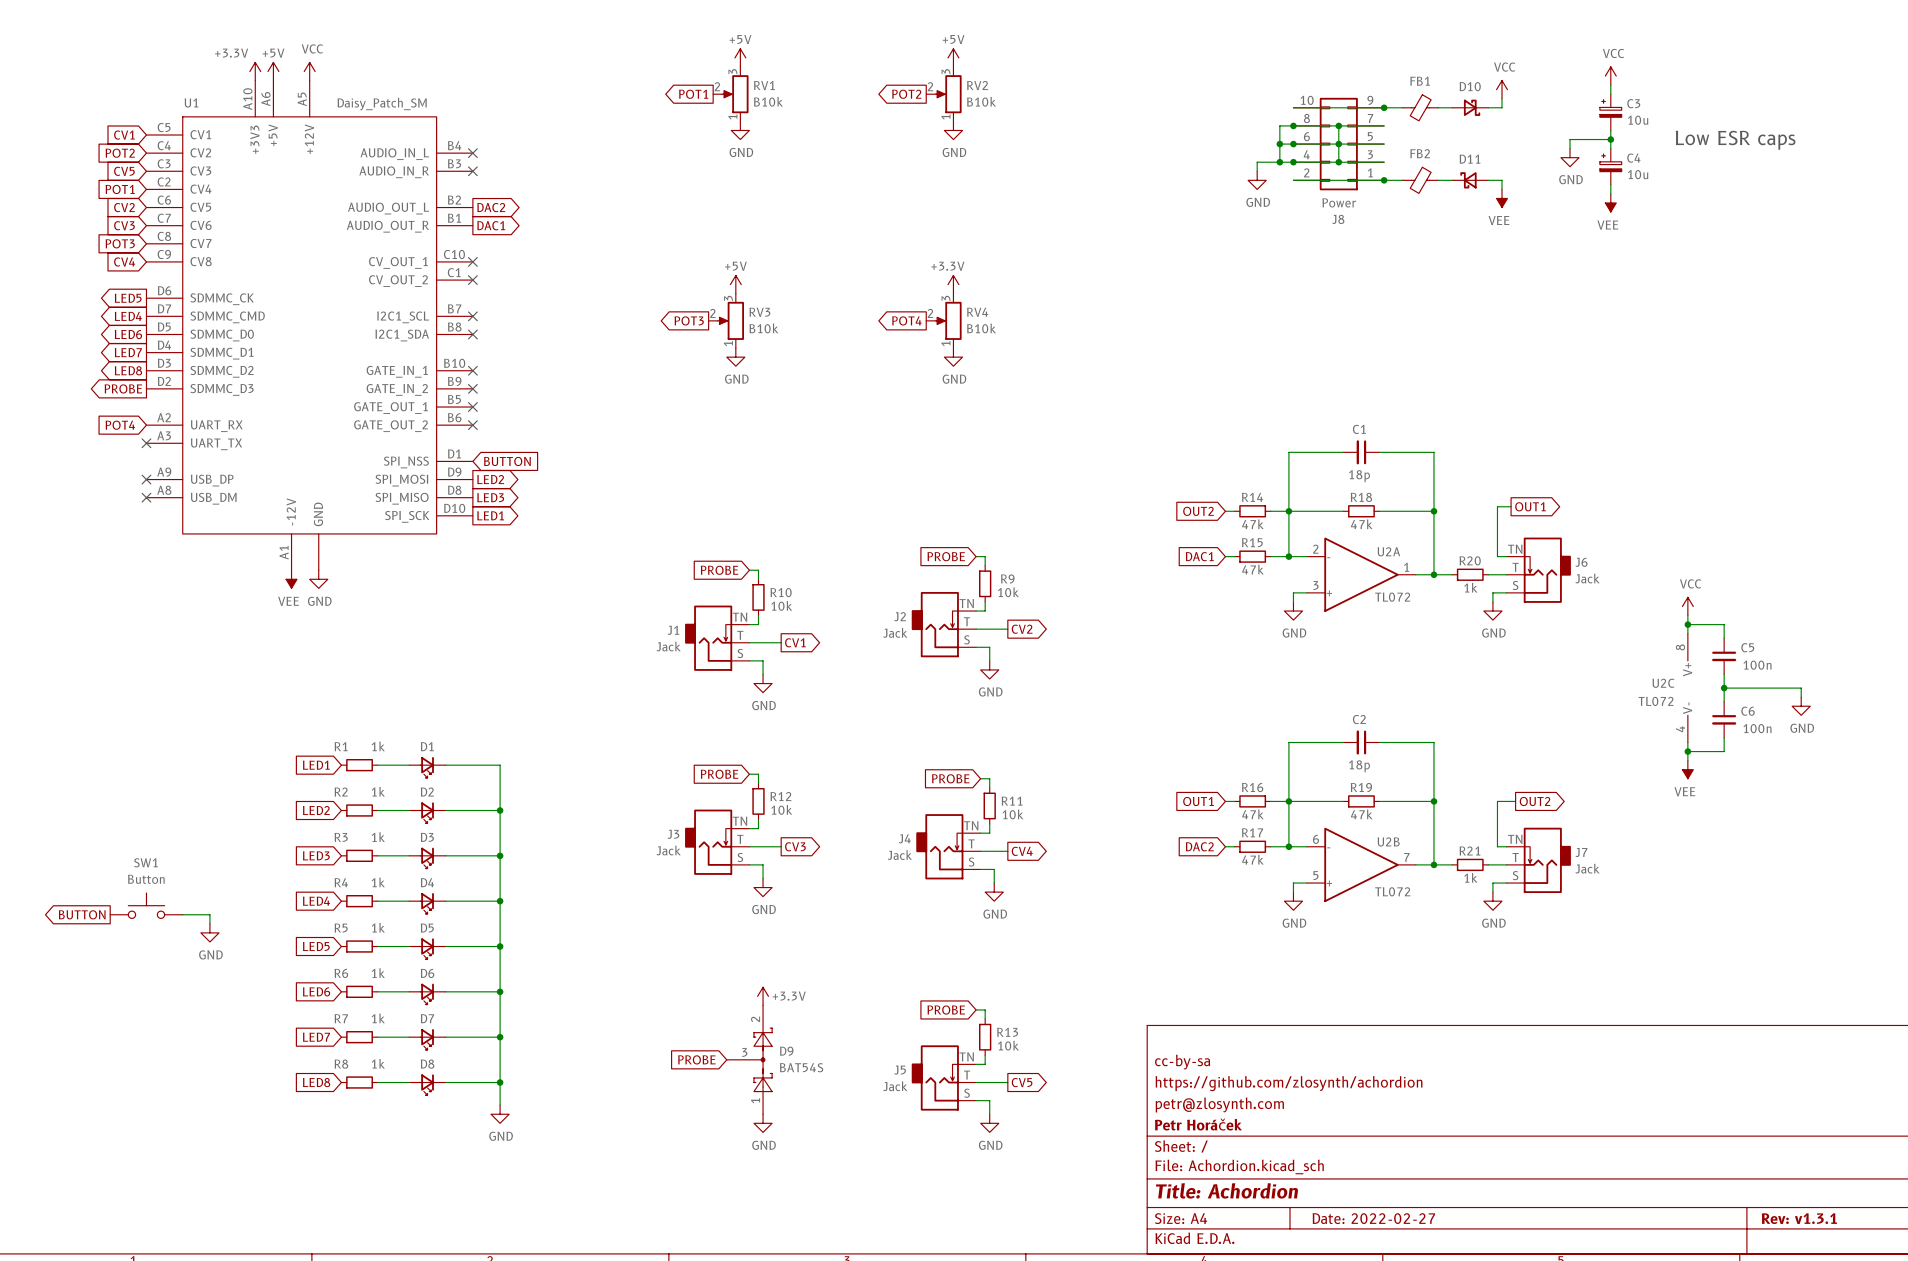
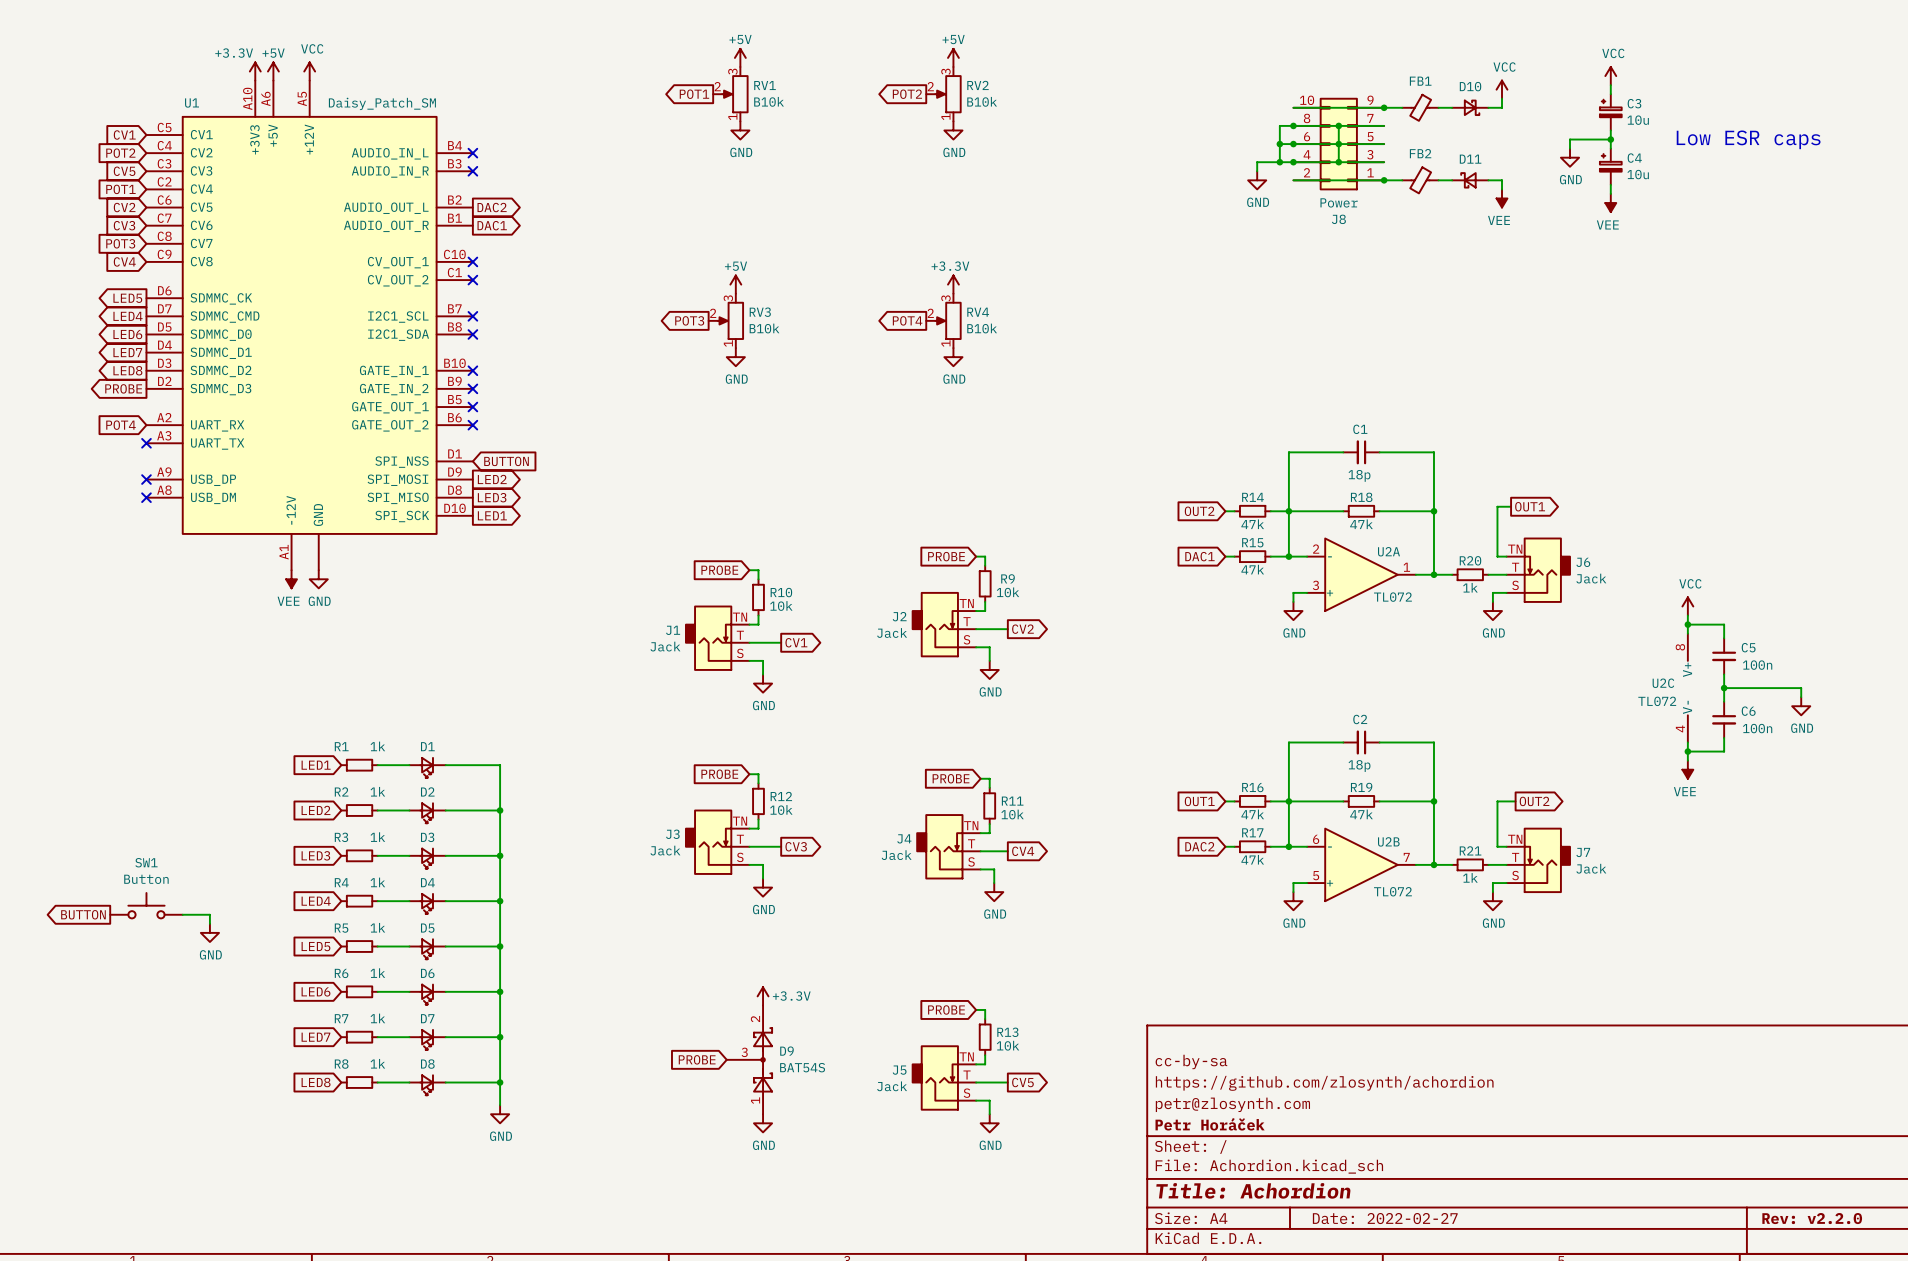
title block: Rev: v1.3.1 (1799, 1218) -> Rev: v2.2.0 (1812, 1218)

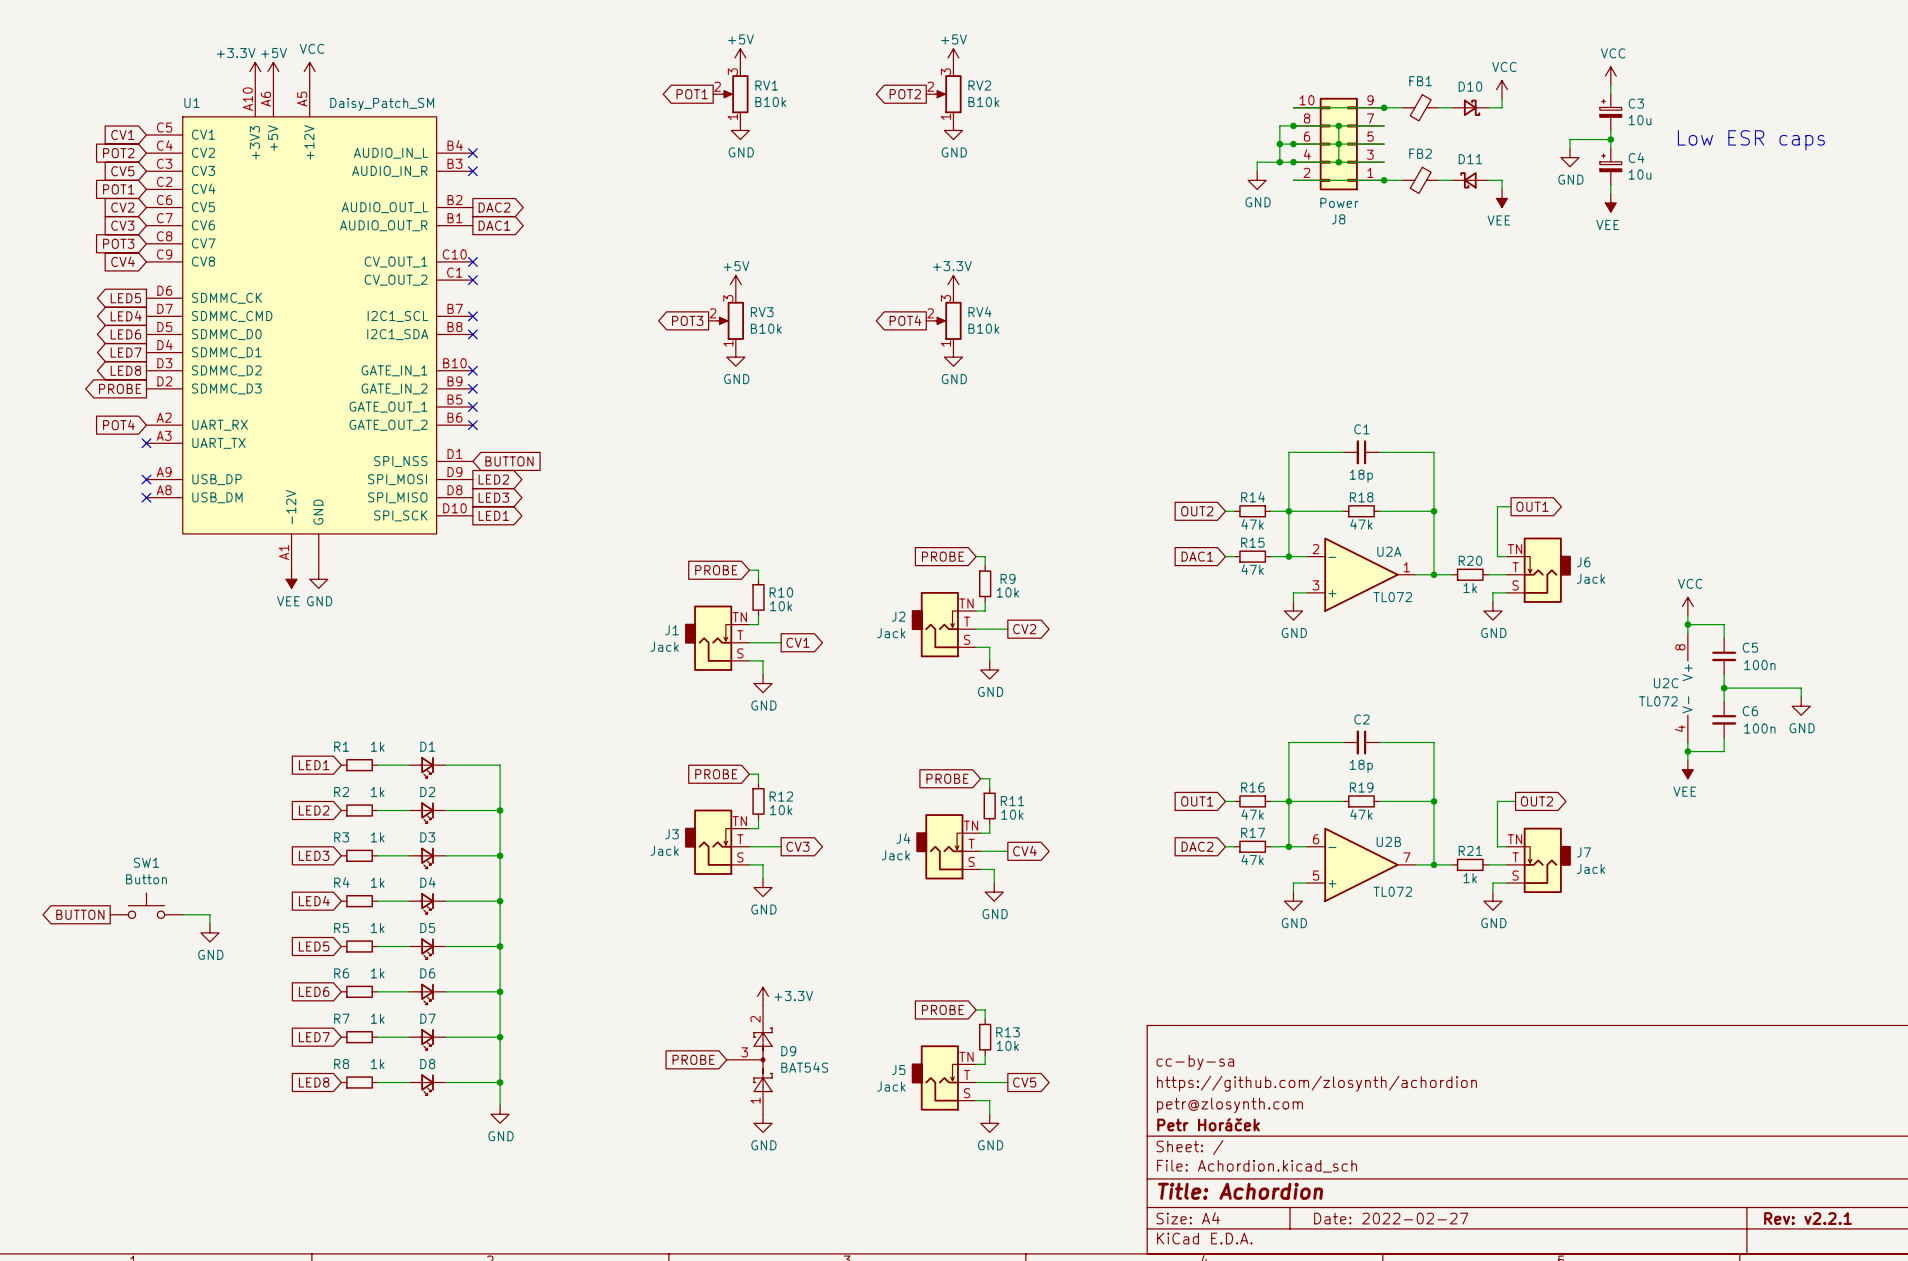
title block: Rev: v2.2.0 (1812, 1218) -> Rev: v2.2.1 (1807, 1218)

